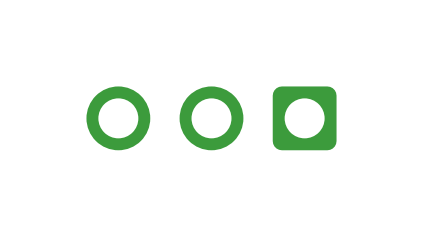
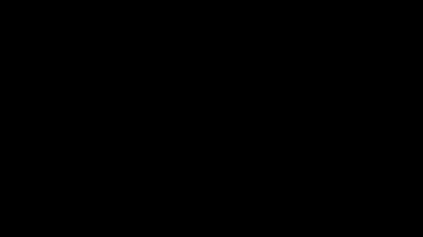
part: (211, 118) -> none

